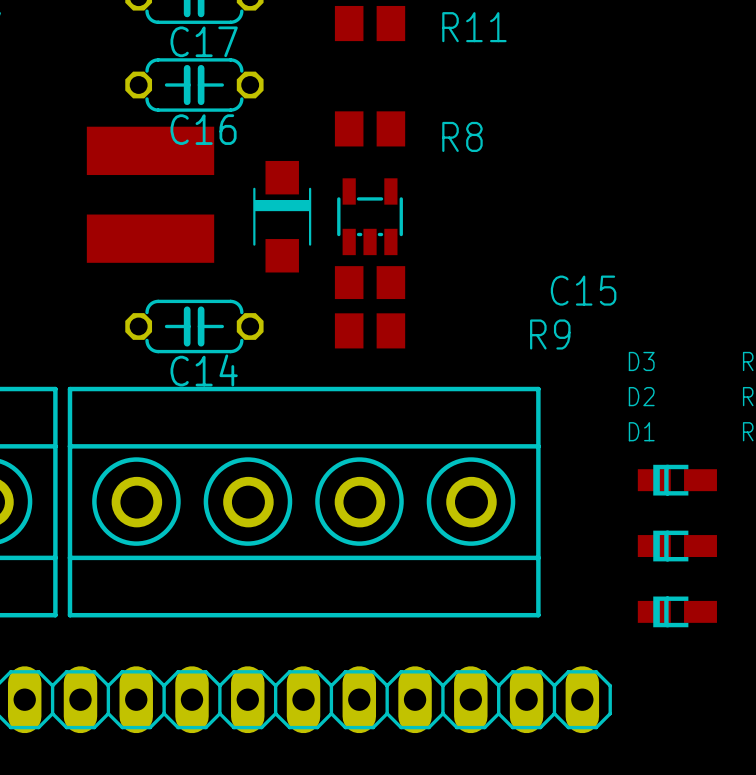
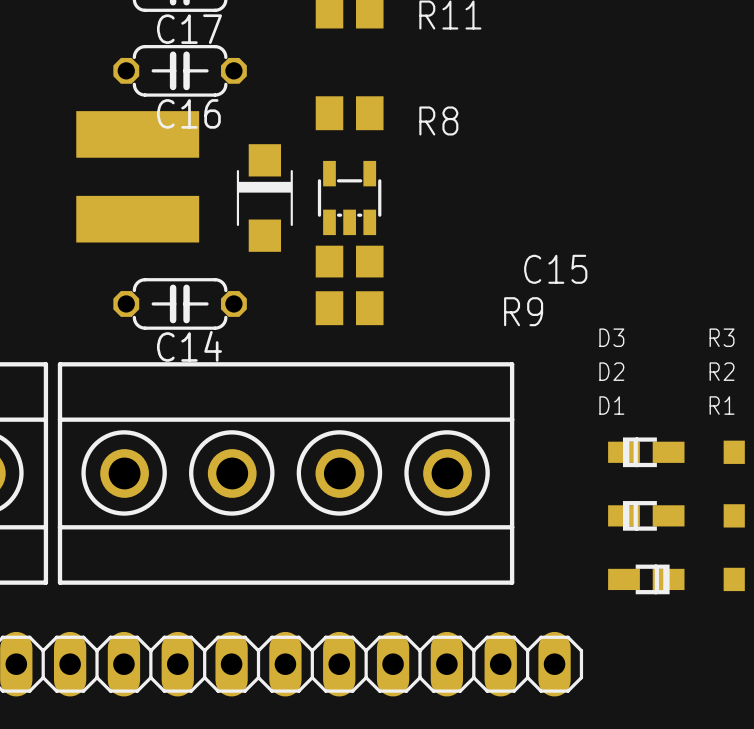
D1 rotation: 0° (677, 611) -> 180° (646, 579)

